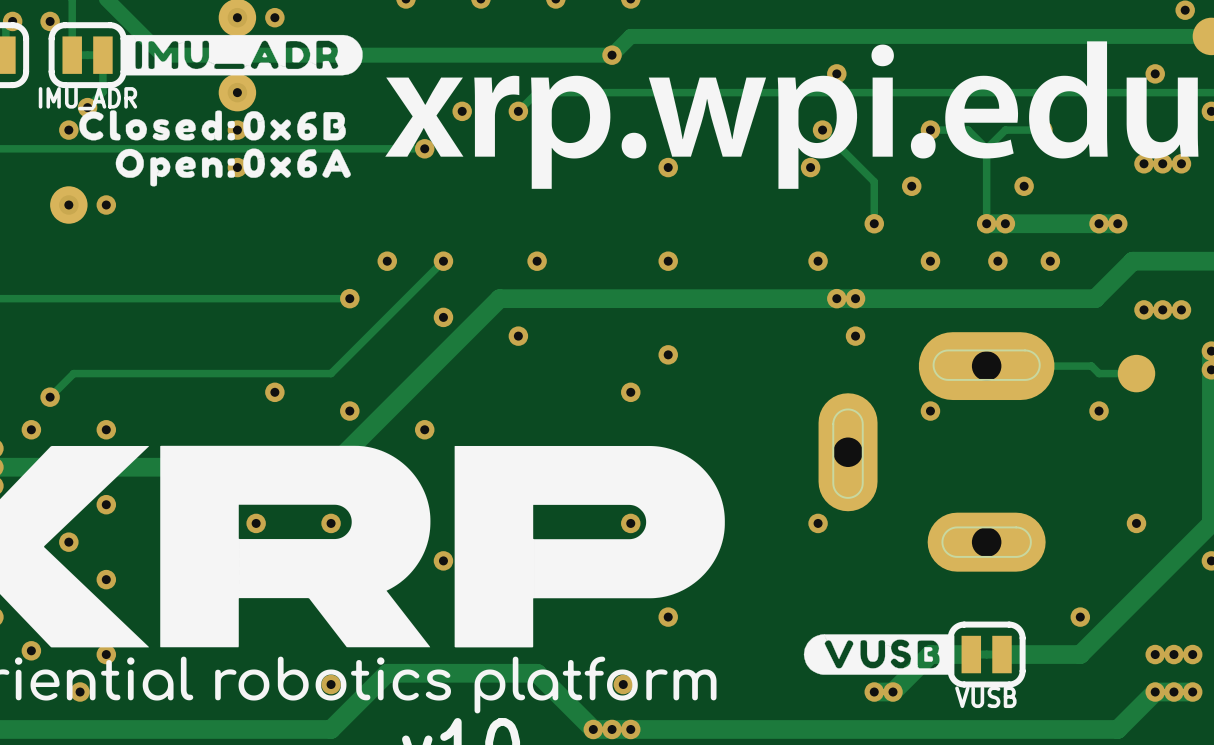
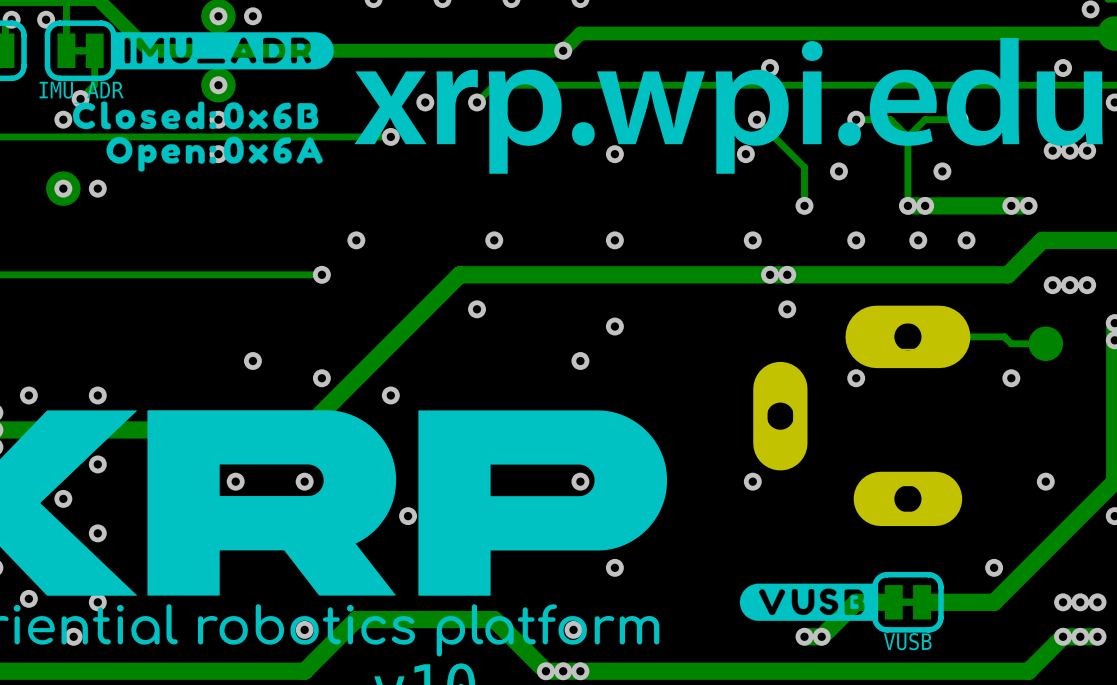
track: (443, 261) (331, 373) (73, 373) (50, 397) -> none
via: (443, 261) -> none
via: (443, 317) -> none
via: (50, 397) -> none

